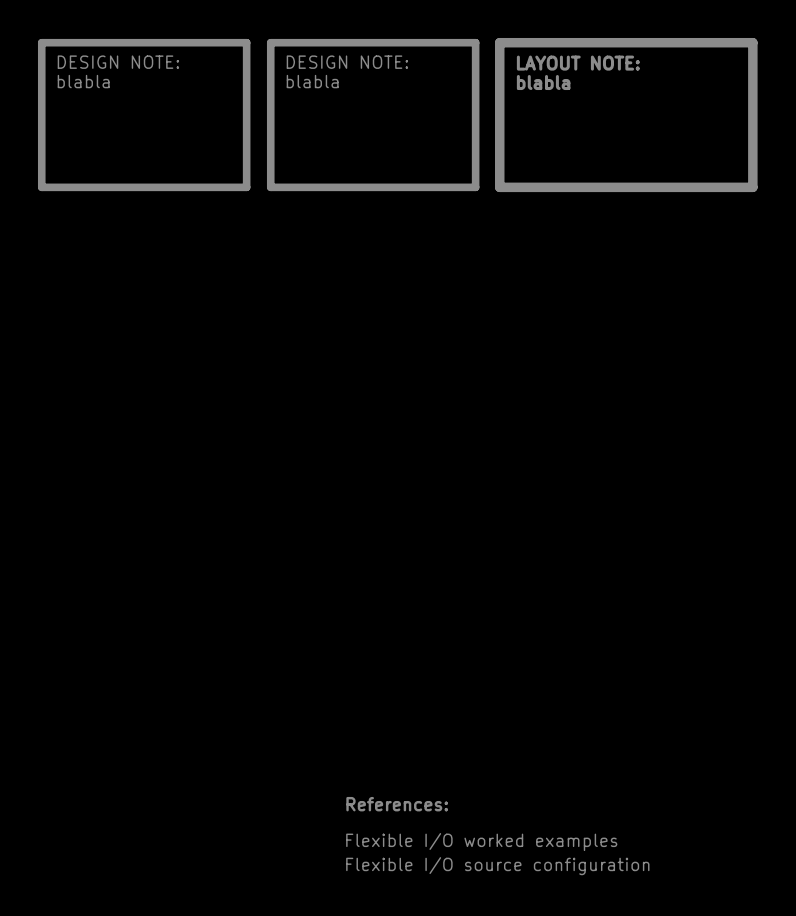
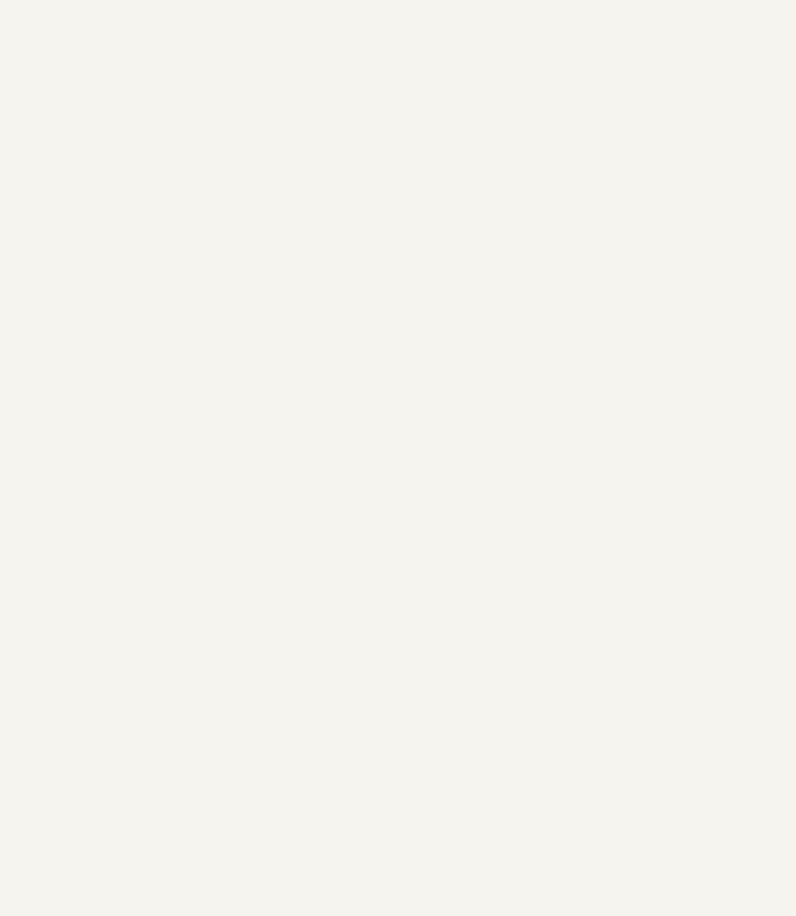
line: (41, 42) (246, 42) (246, 187) (41, 187) (41, 42) -> none
line: (270, 42) (475, 42) (475, 187) (270, 187) (270, 42) -> none
line: (499, 42) (752, 42) (752, 187) (499, 187) (499, 42) -> none
text: DESIGN NOTE: (118, 62) -> none
text: DESIGN NOTE: (347, 62) -> none
text: LAYOUT NOTE: (578, 63) -> none
text: blabla (83, 81) -> none
text: blabla (312, 81) -> none
text: blabla (543, 82) -> none
text: References: (397, 804) -> none
text: Flexible I/O worked examples (481, 842) -> none
text: Flexible I/O source configuration (497, 866) -> none

